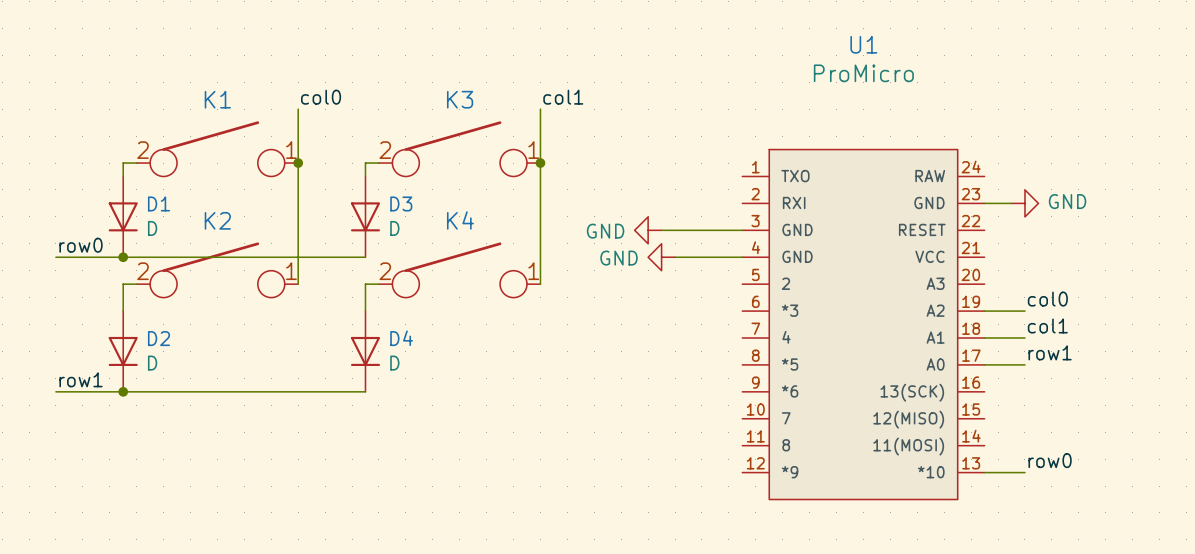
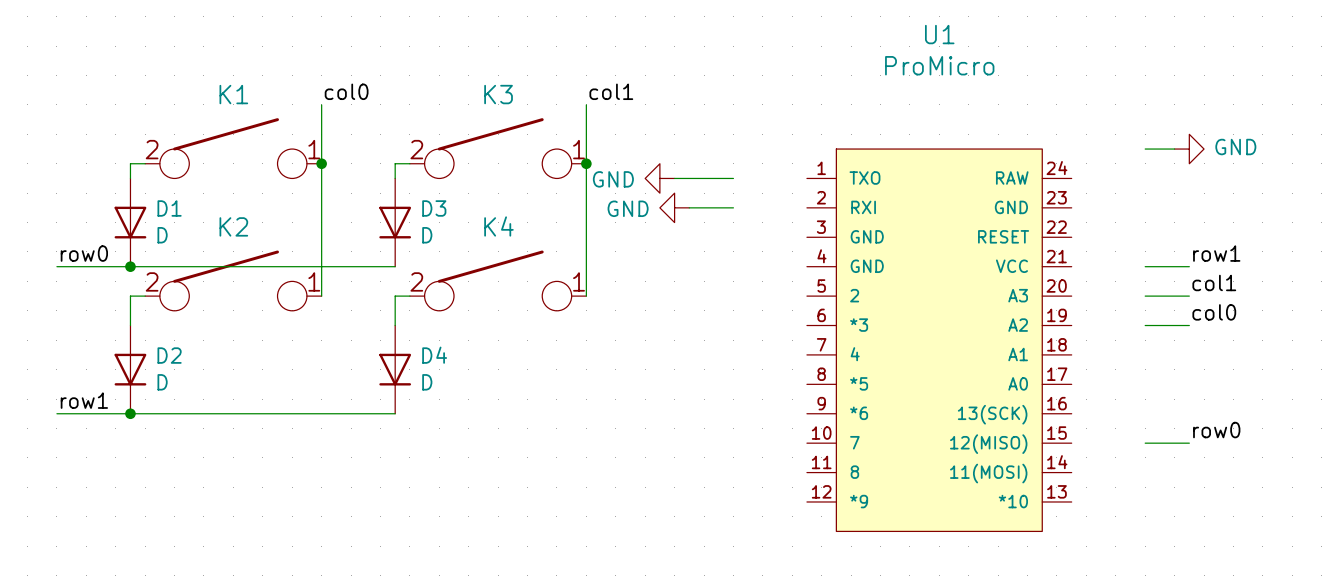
power symbol: none -> GND (659, 178)
wire: none -> (674, 178) (733, 178)
power symbol: none -> GND (674, 207)
wire: none -> (689, 207) (733, 207)
wire: (984, 203) (1011, 203) -> (1145, 149) (1174, 149)
power symbol position: GND (1024, 203) -> GND (1189, 149)
power symbol: GND (648, 230) -> none
wire: (661, 230) (742, 230) -> none
power symbol: GND (661, 257) -> none
wire: (675, 257) (742, 257) -> none
label position: col0 (1047, 299) -> col0 (1214, 312)
wire: (984, 311) (1024, 311) -> (1145, 266) (1189, 266)
label position: col1 (1047, 325) -> col1 (1214, 282)
wire: (984, 338) (1024, 338) -> (1145, 296) (1189, 296)
label position: row1 (1050, 352) -> row1 (1216, 253)
wire: (984, 364) (1024, 364) -> (1145, 325) (1189, 325)
label position: row0 (1050, 460) -> row0 (1216, 430)
wire: (984, 472) (1024, 472) -> (1145, 443) (1189, 443)

